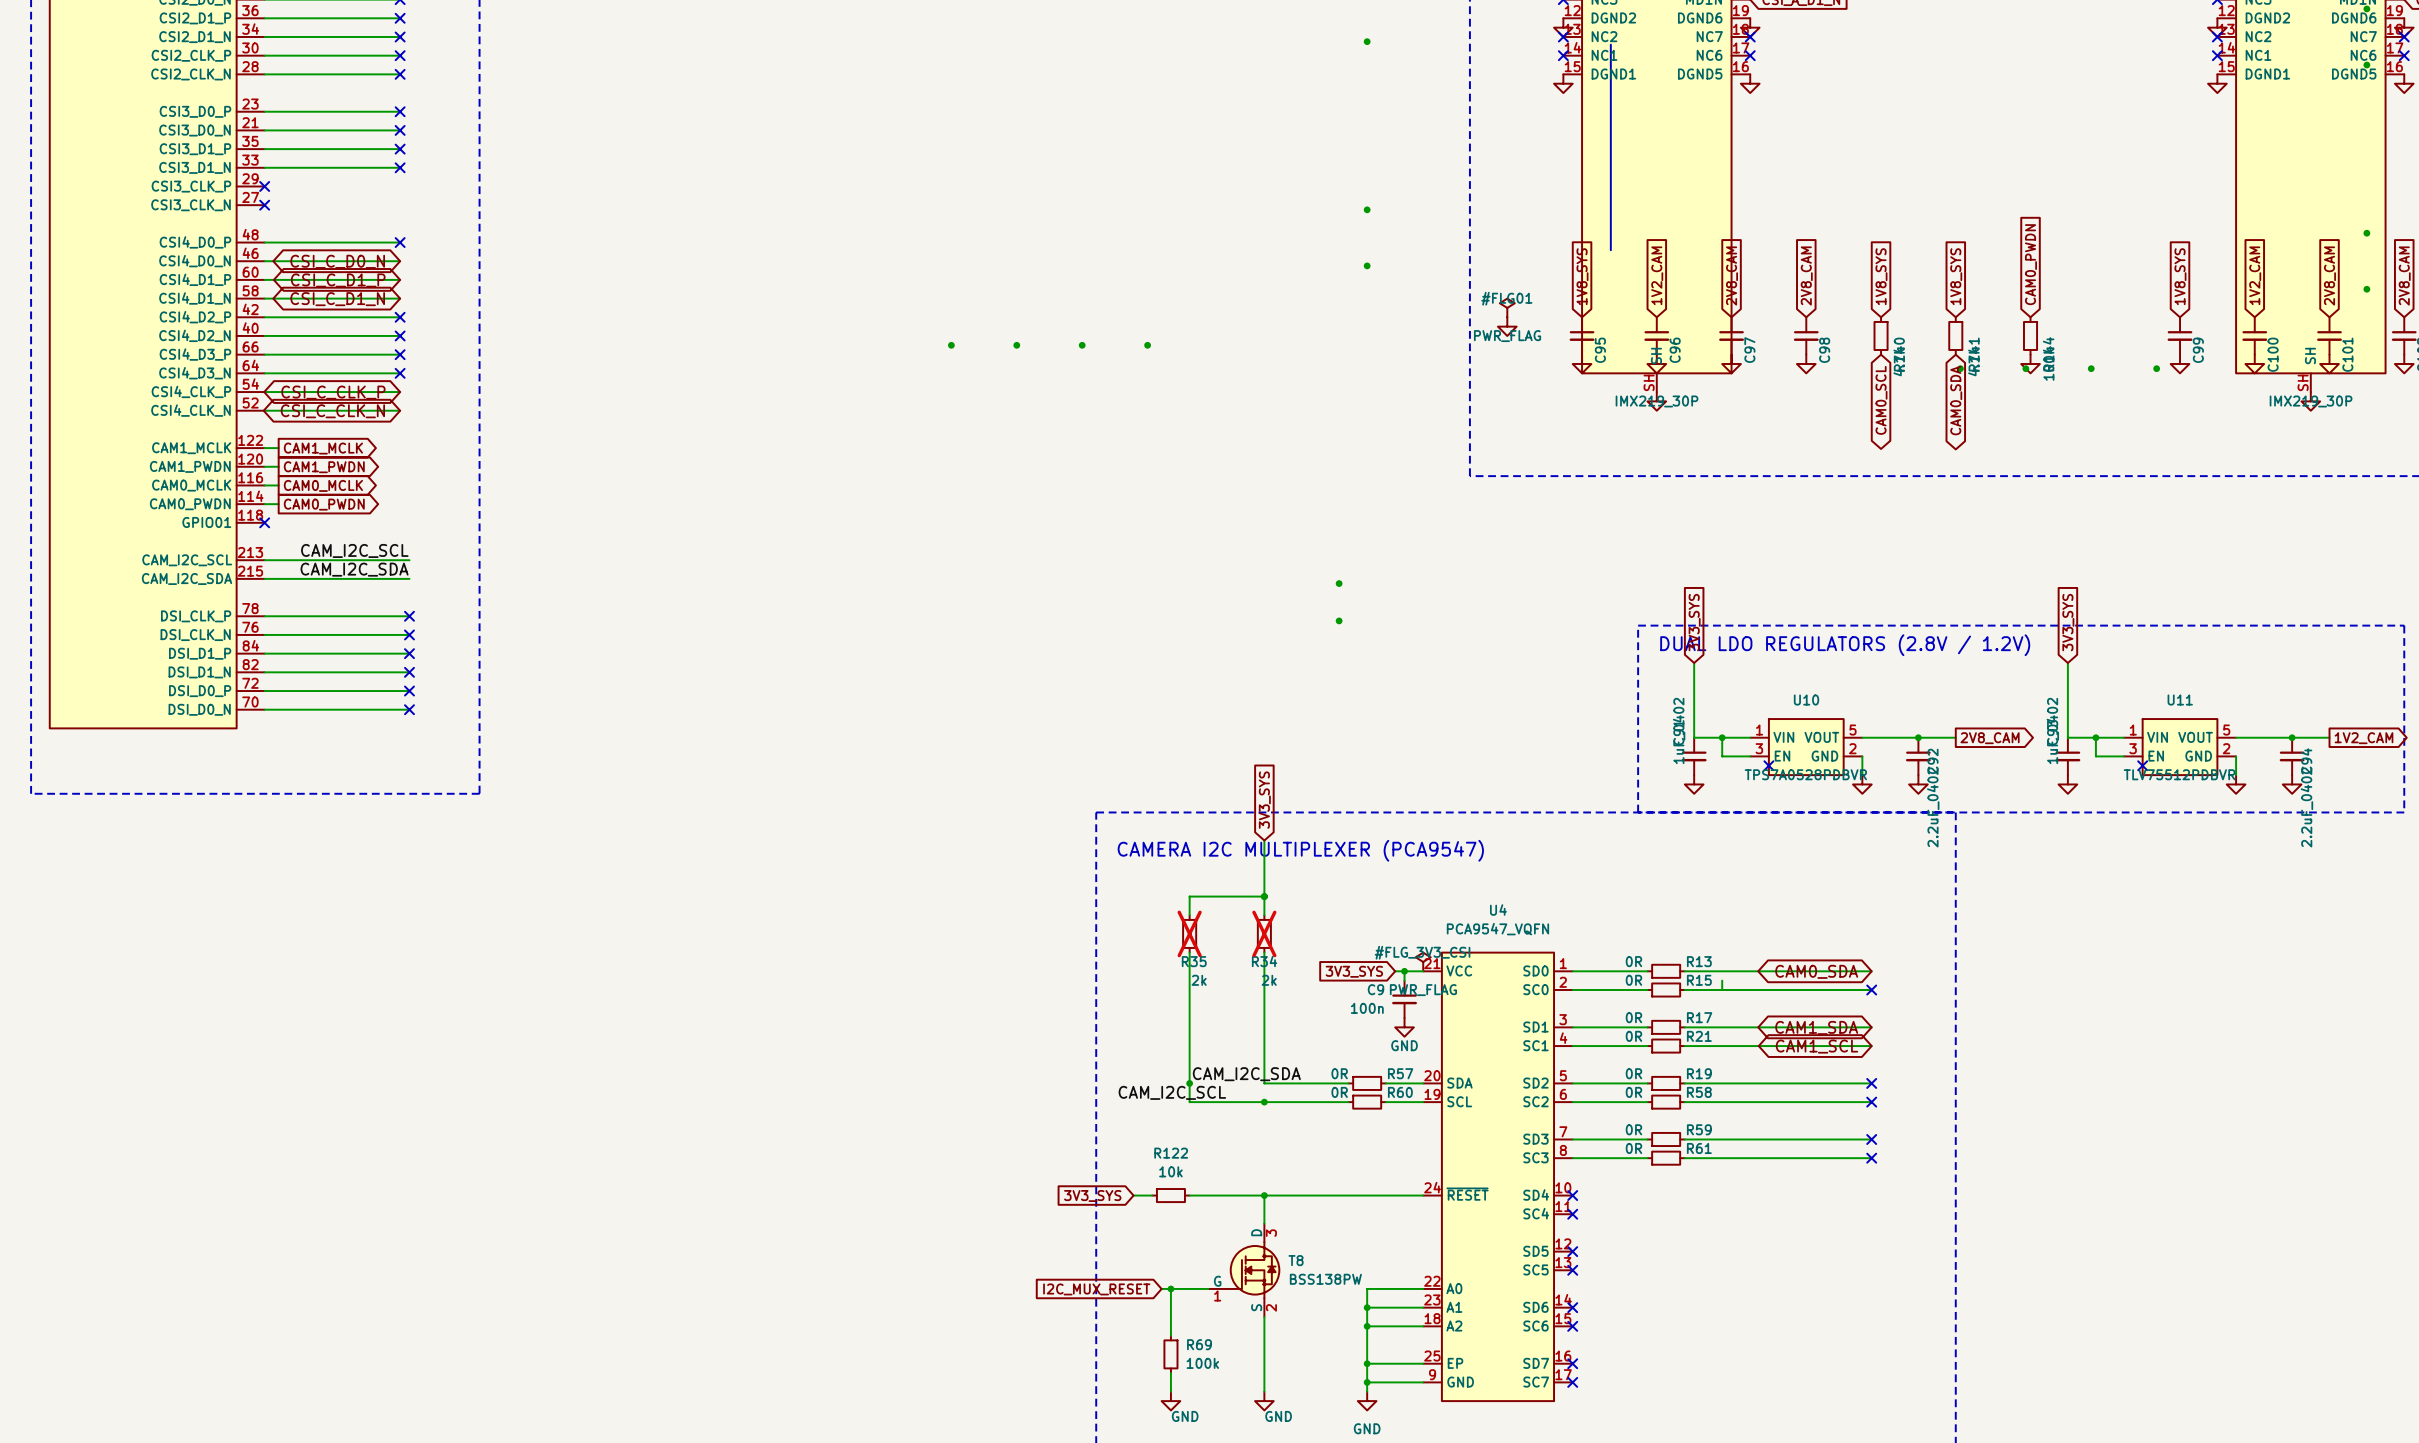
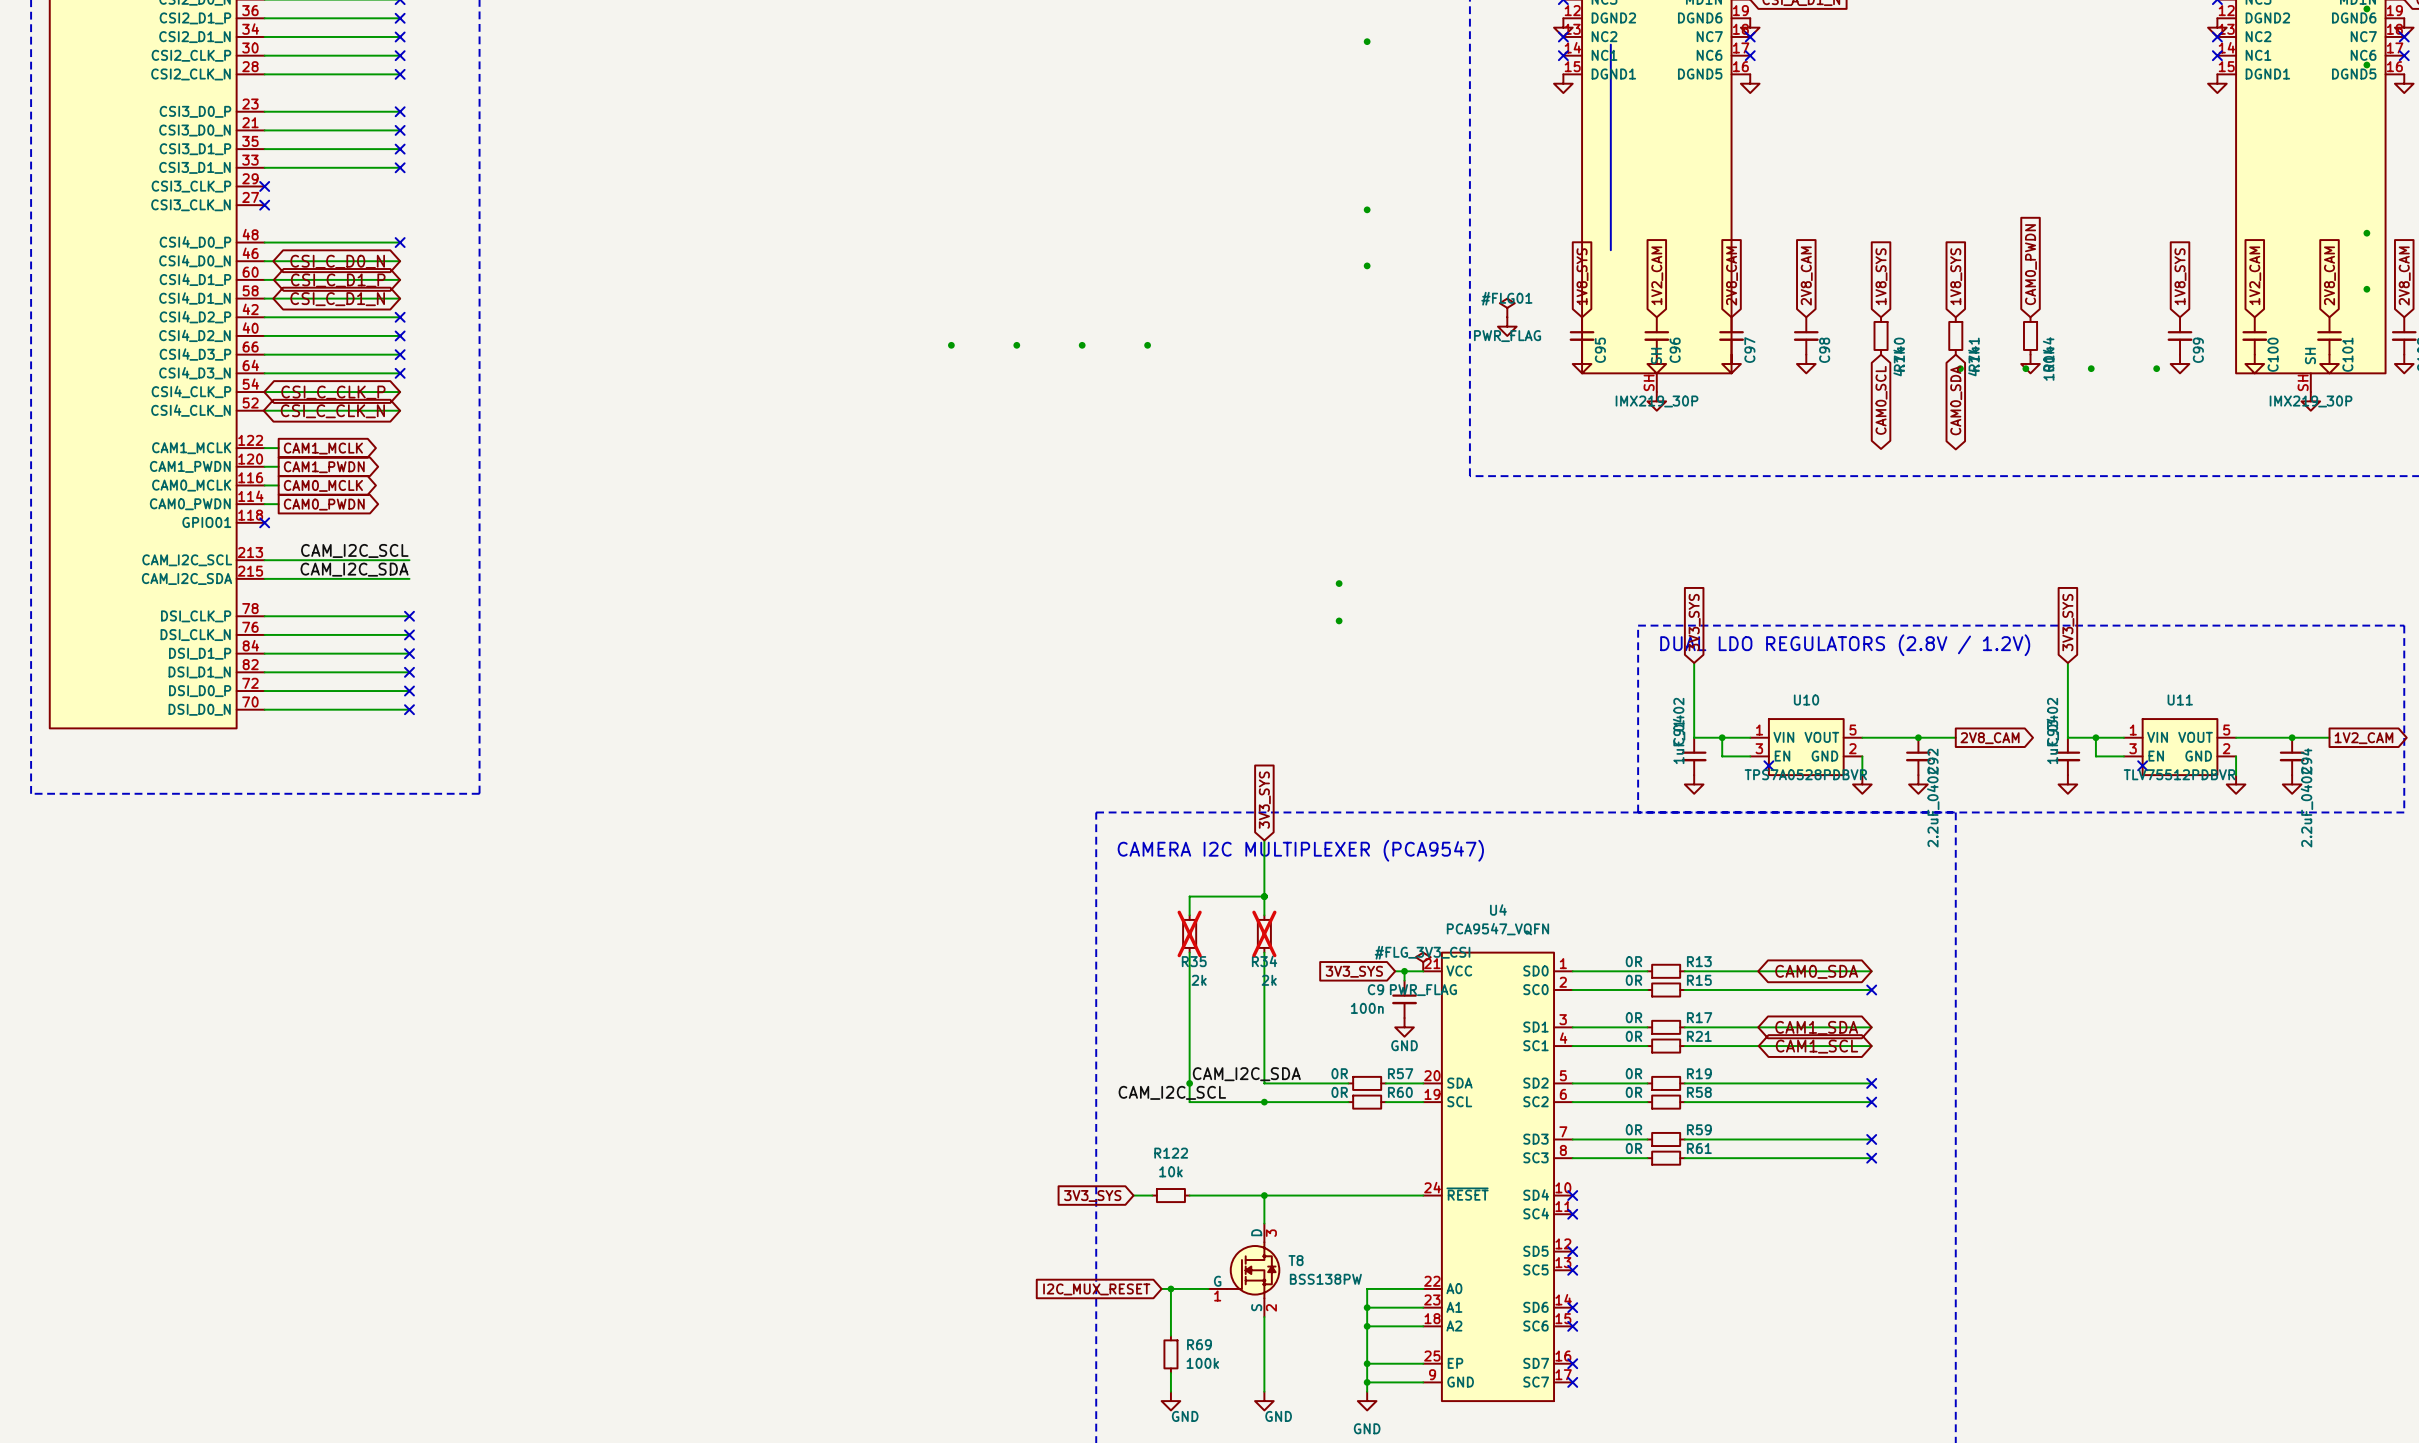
wire: (1722, 980) (1722, 989) -> none

